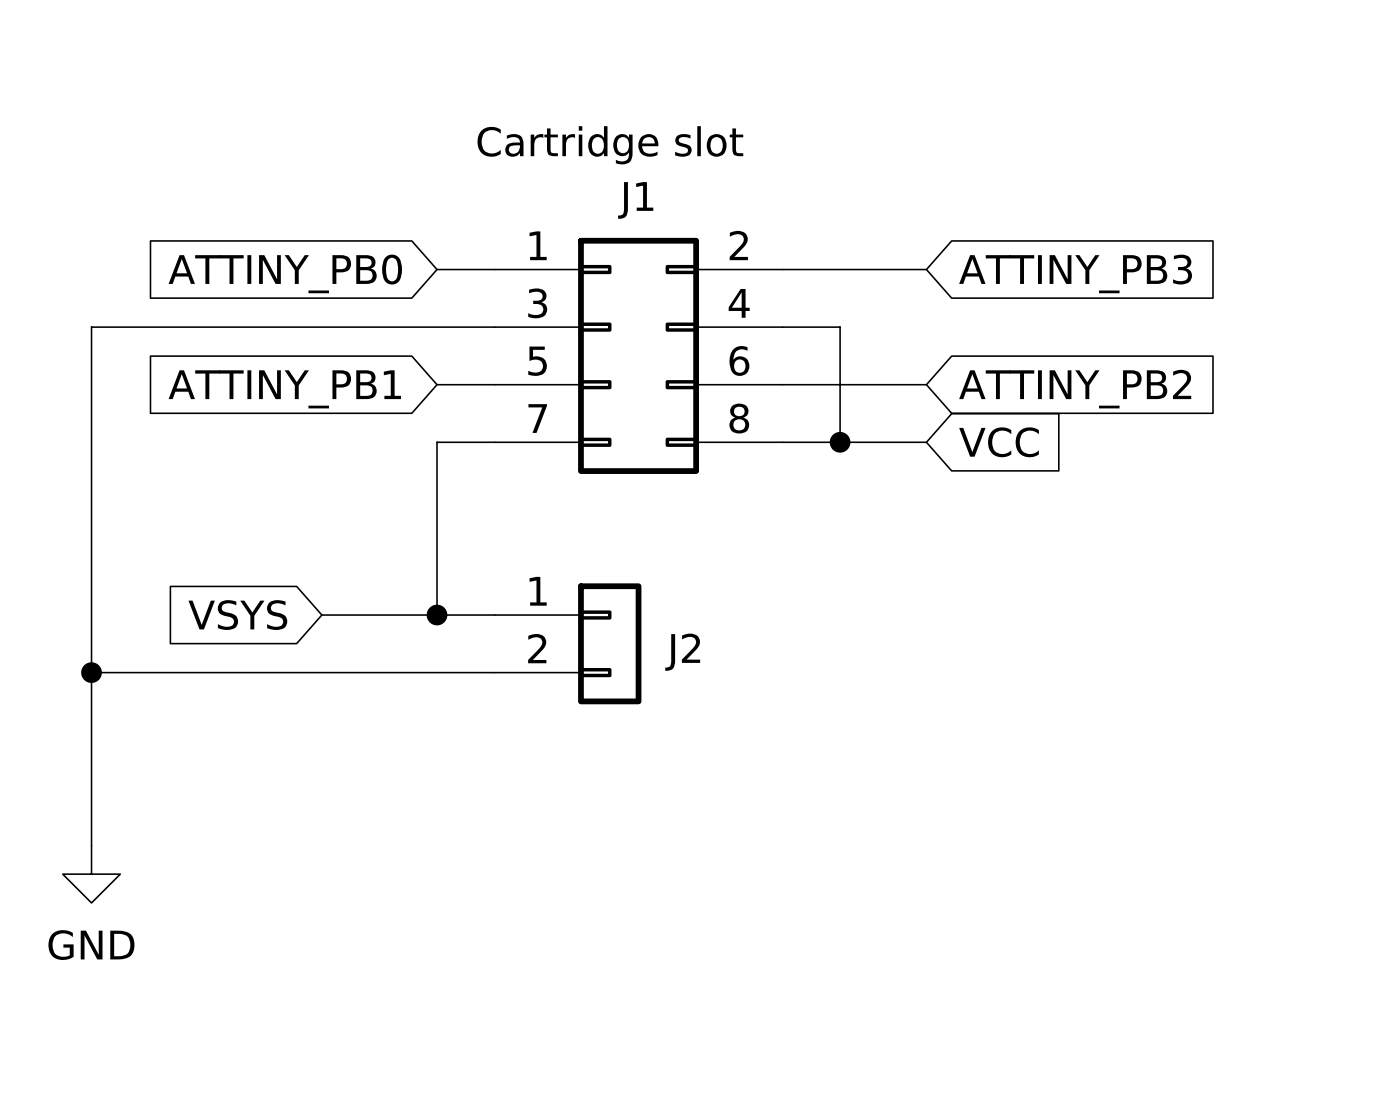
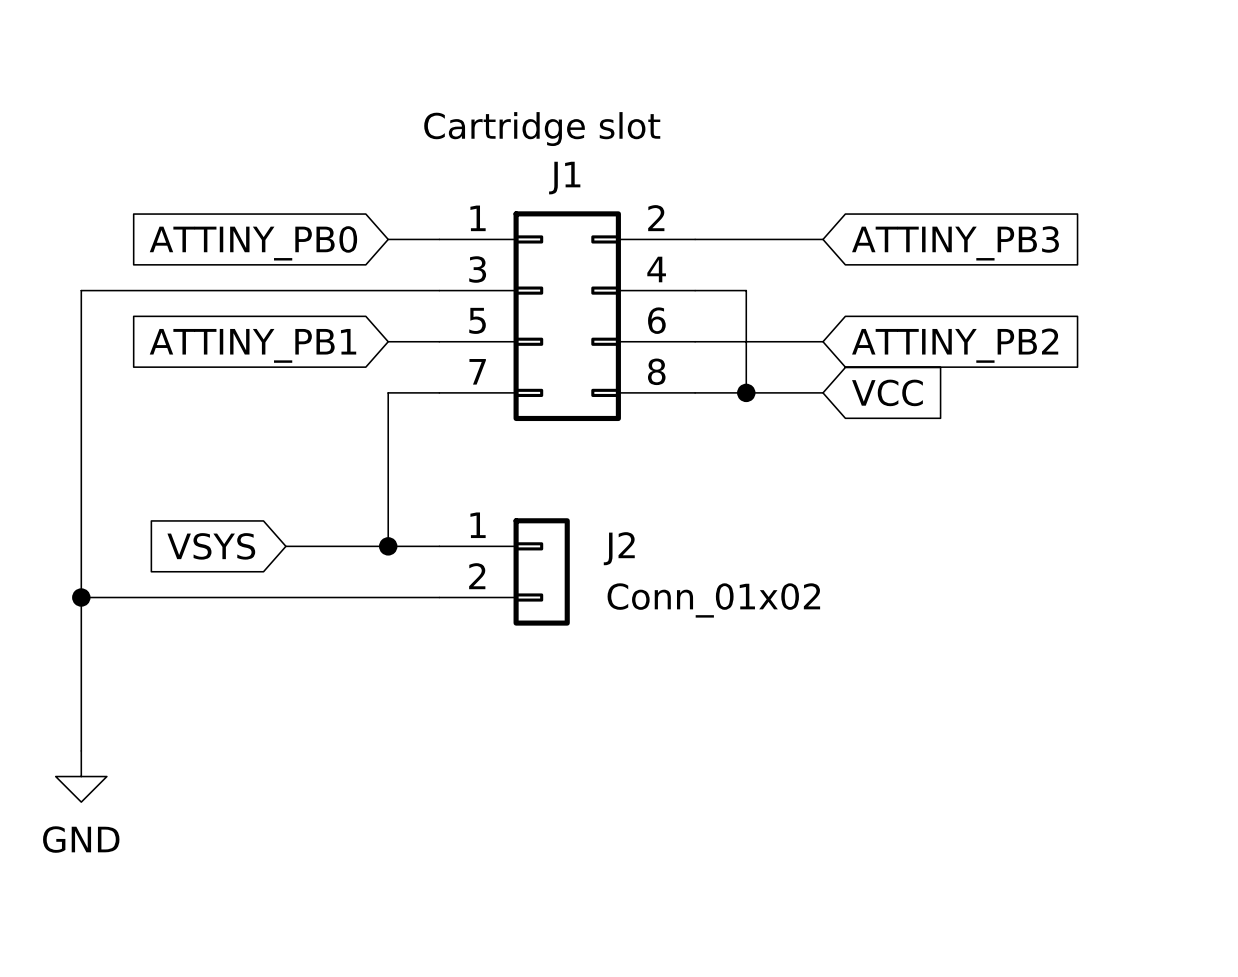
J2 name position: J2 (682, 652) -> J2 (619, 548)
J2 value: none -> Conn_01x02 (713, 600)

